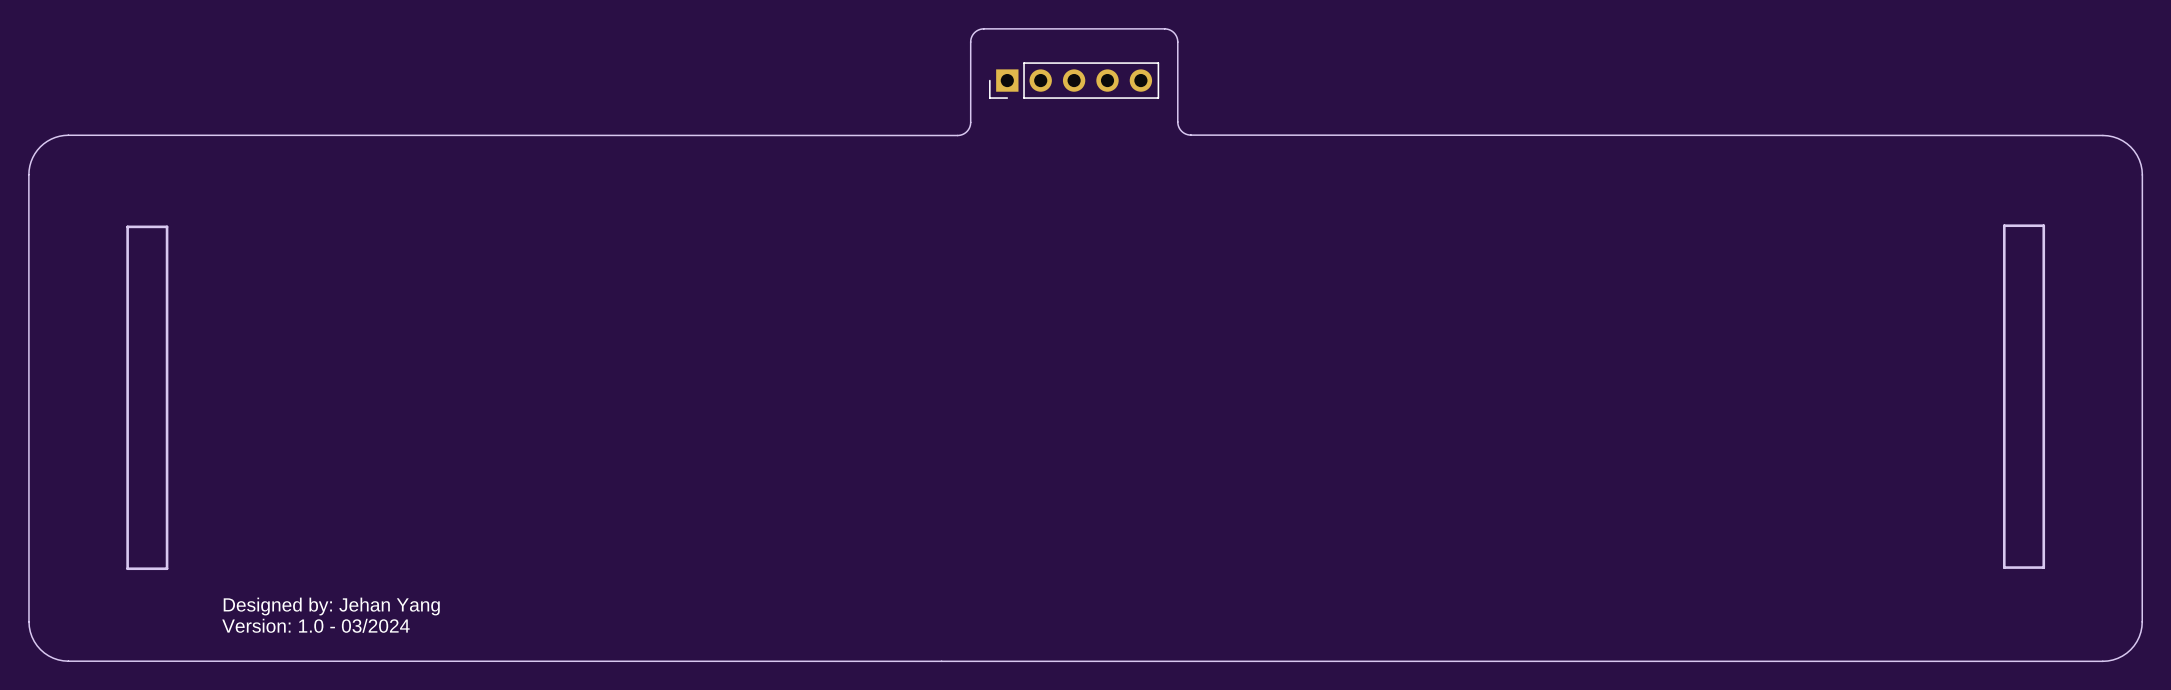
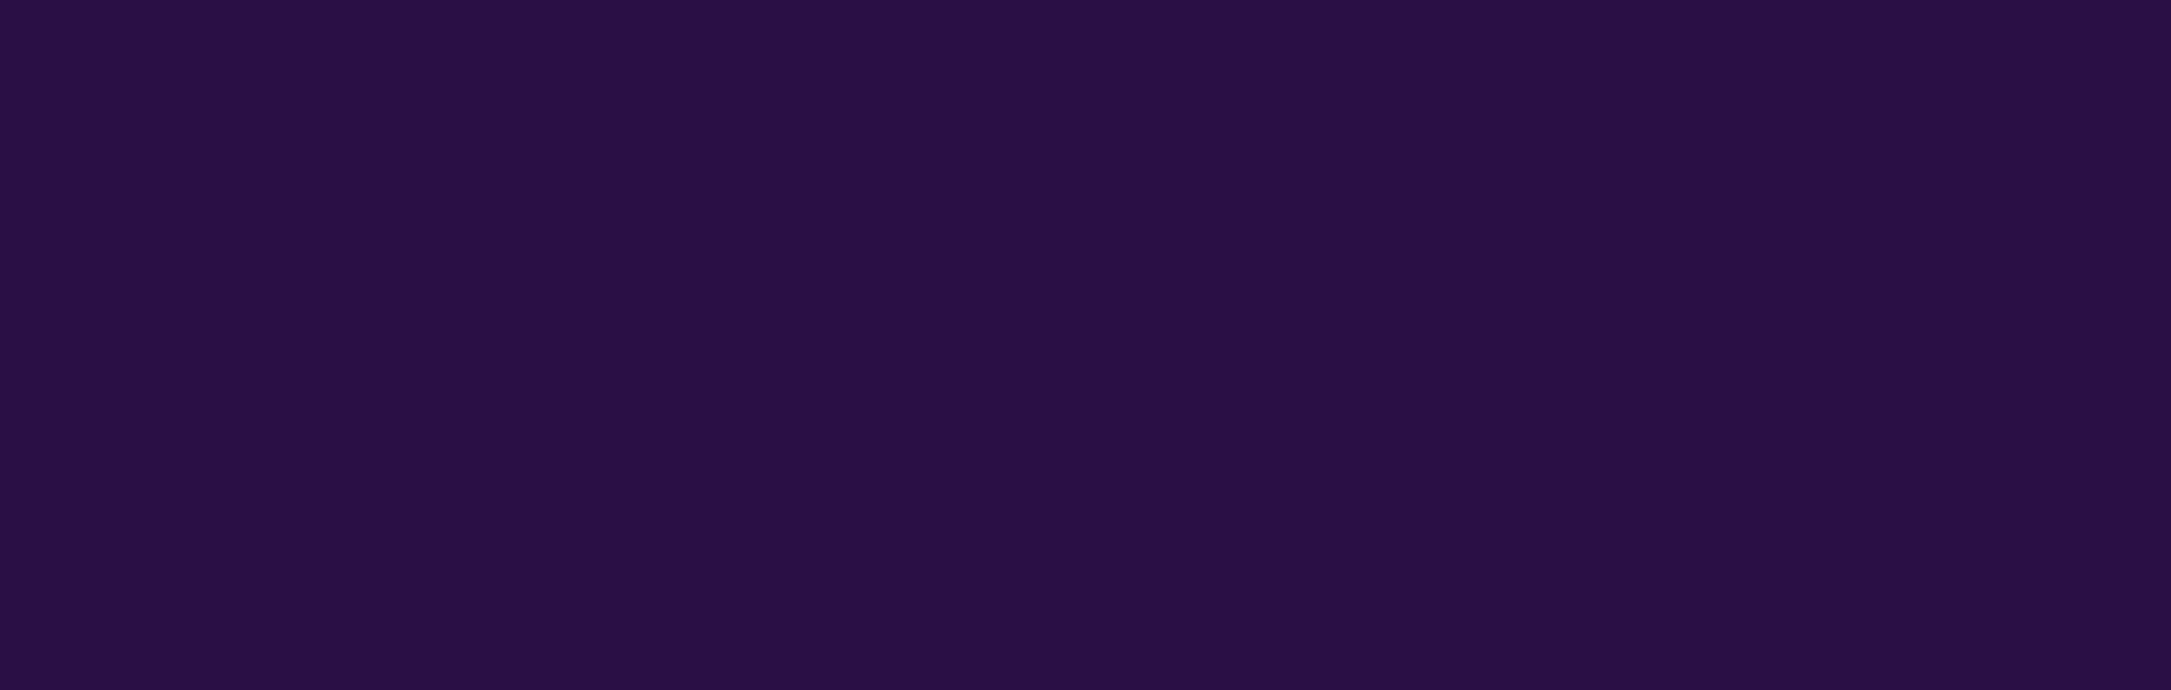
board edge: (1164, 28) (978, 30) (973, 33) (970, 40) (970, 125) (966, 131) (959, 135) (68, 135) (51, 139) (34, 153) (28, 174) (28, 621) (34, 641) (48, 655) (68, 661) (941, 661) (2102, 661) (2122, 656) (2136, 641) (2142, 621) (2142, 174) (2137, 155) (2122, 140) (2102, 135) (1189, 135) (1181, 131) (1177, 123) (1177, 39) (1172, 31) (1164, 28) -> none
part: (1074, 80) -> none
board edge: (2043, 225) (2004, 225) (2004, 567) (2043, 567) (2043, 225) -> none
board edge: (167, 226) (127, 226) (127, 568) (167, 568) (167, 226) -> none
text: Designed by: Jehan Yang (331, 606) -> none
text: Version: 1.0 - 03/2024 (315, 625) -> none

